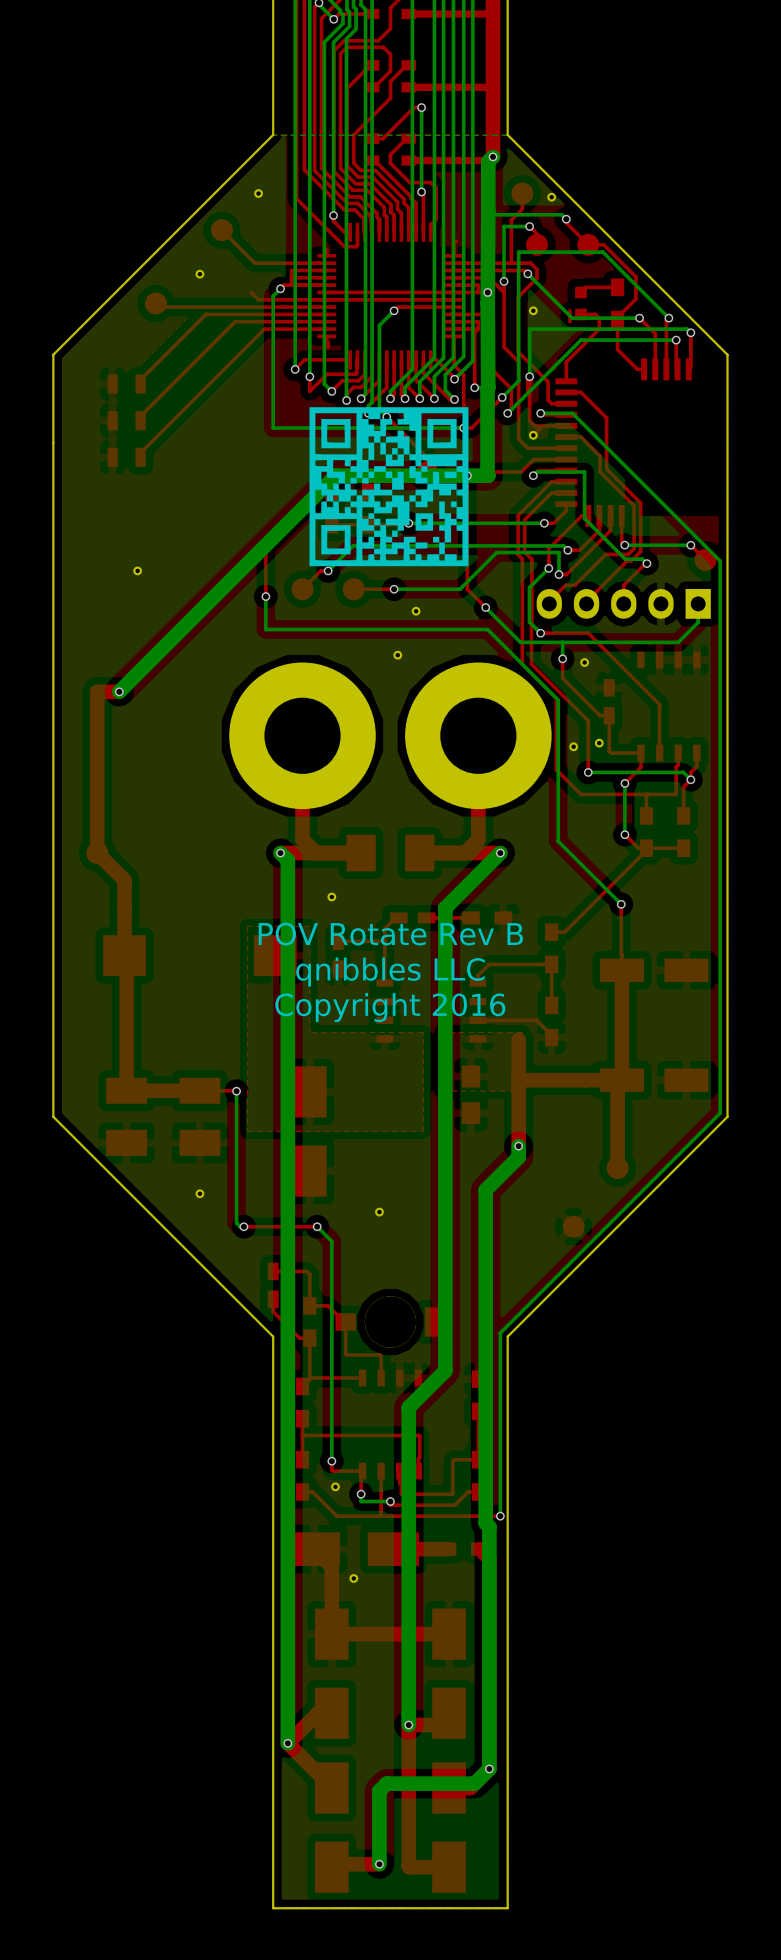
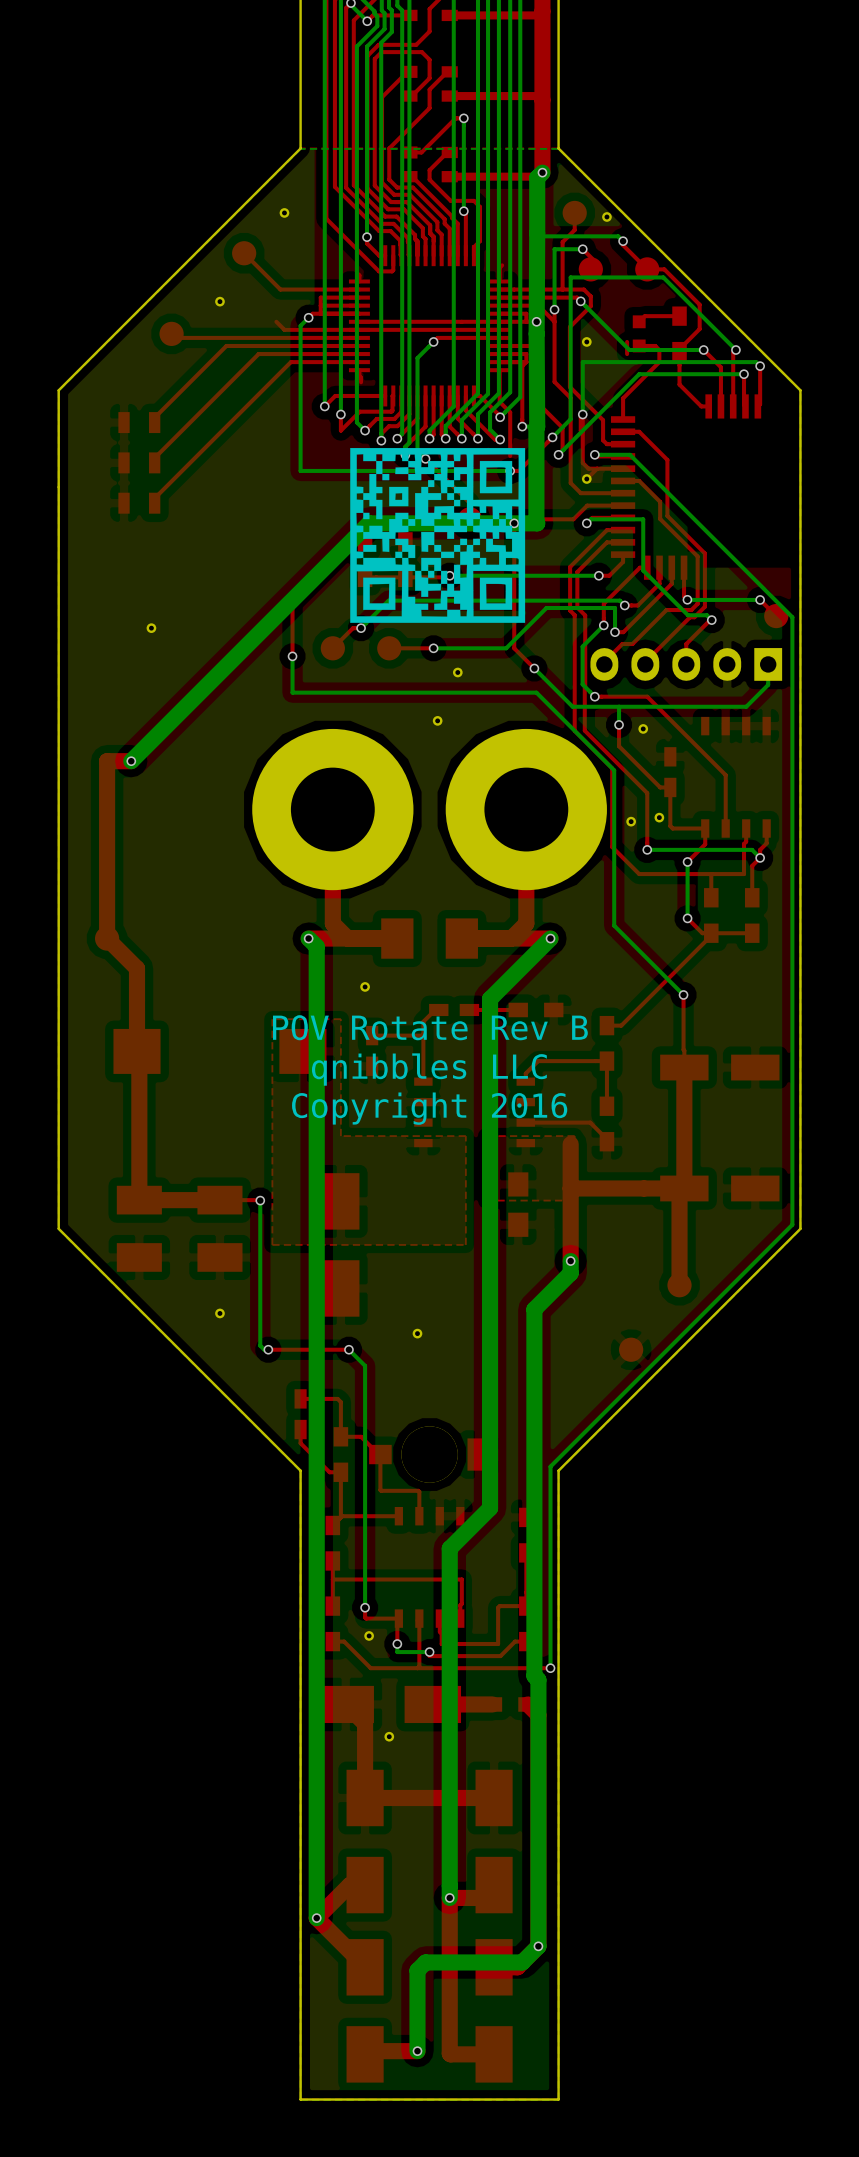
drawing shape: [309, 407, 469, 567] -> [350, 447, 526, 623]

